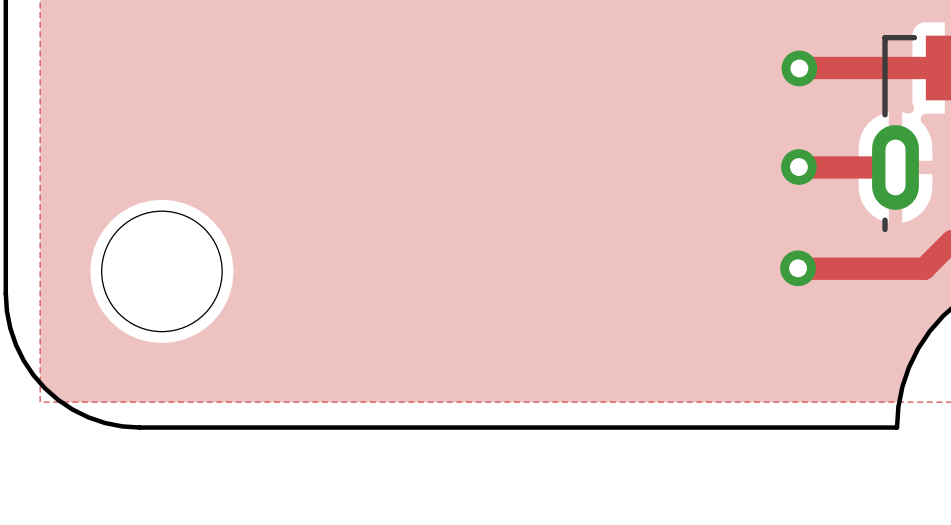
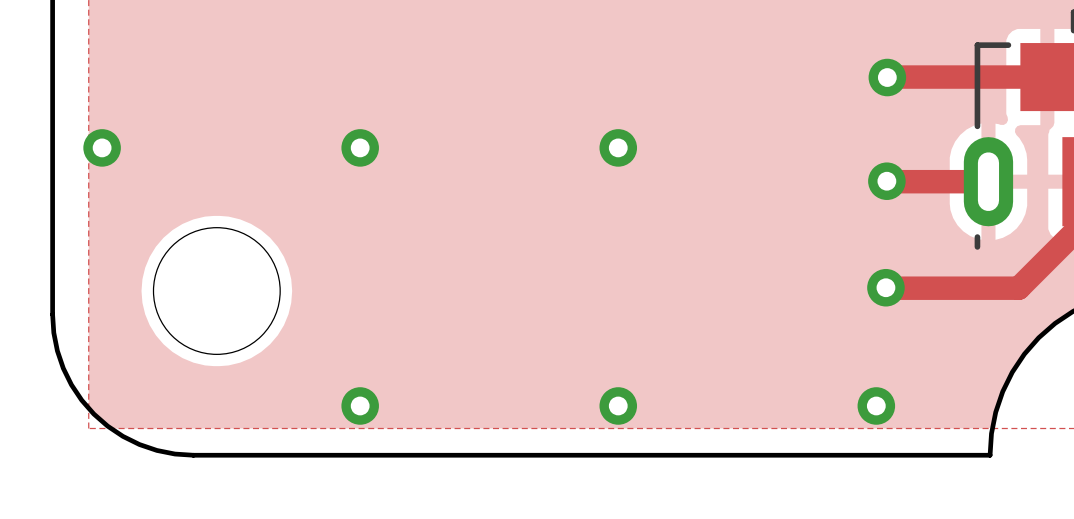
via: none -> (102, 147)
via: none -> (360, 147)
via: none -> (618, 147)
via: none -> (360, 405)
via: none -> (618, 405)
via: none -> (876, 405)

